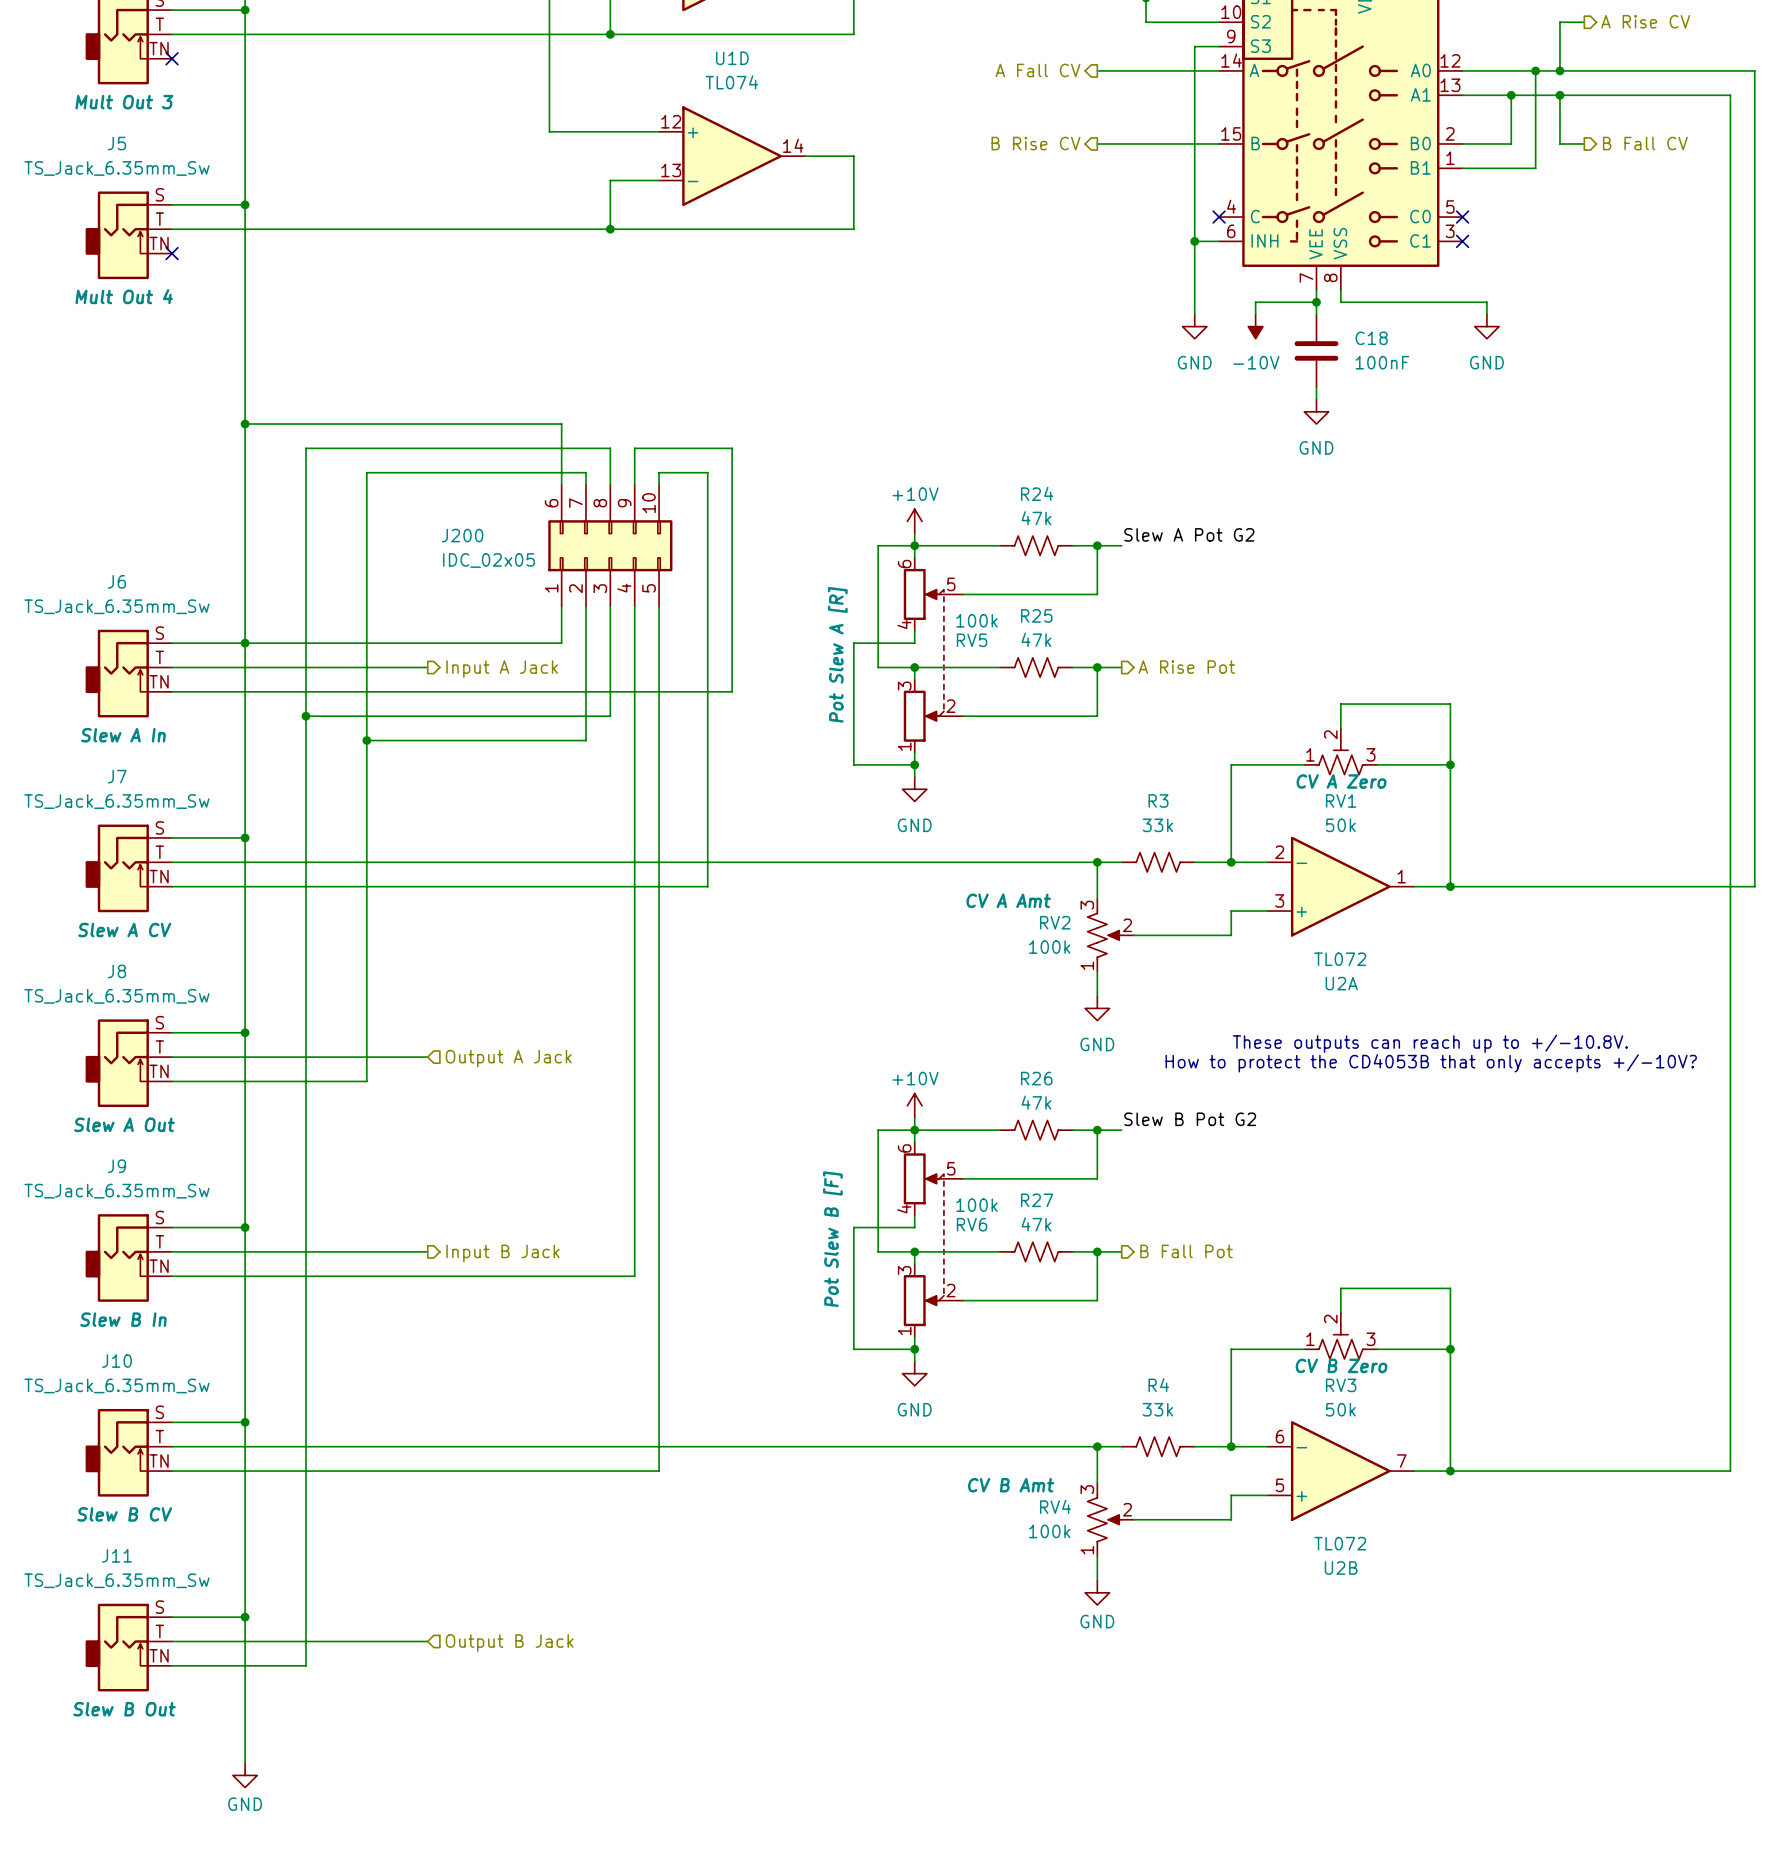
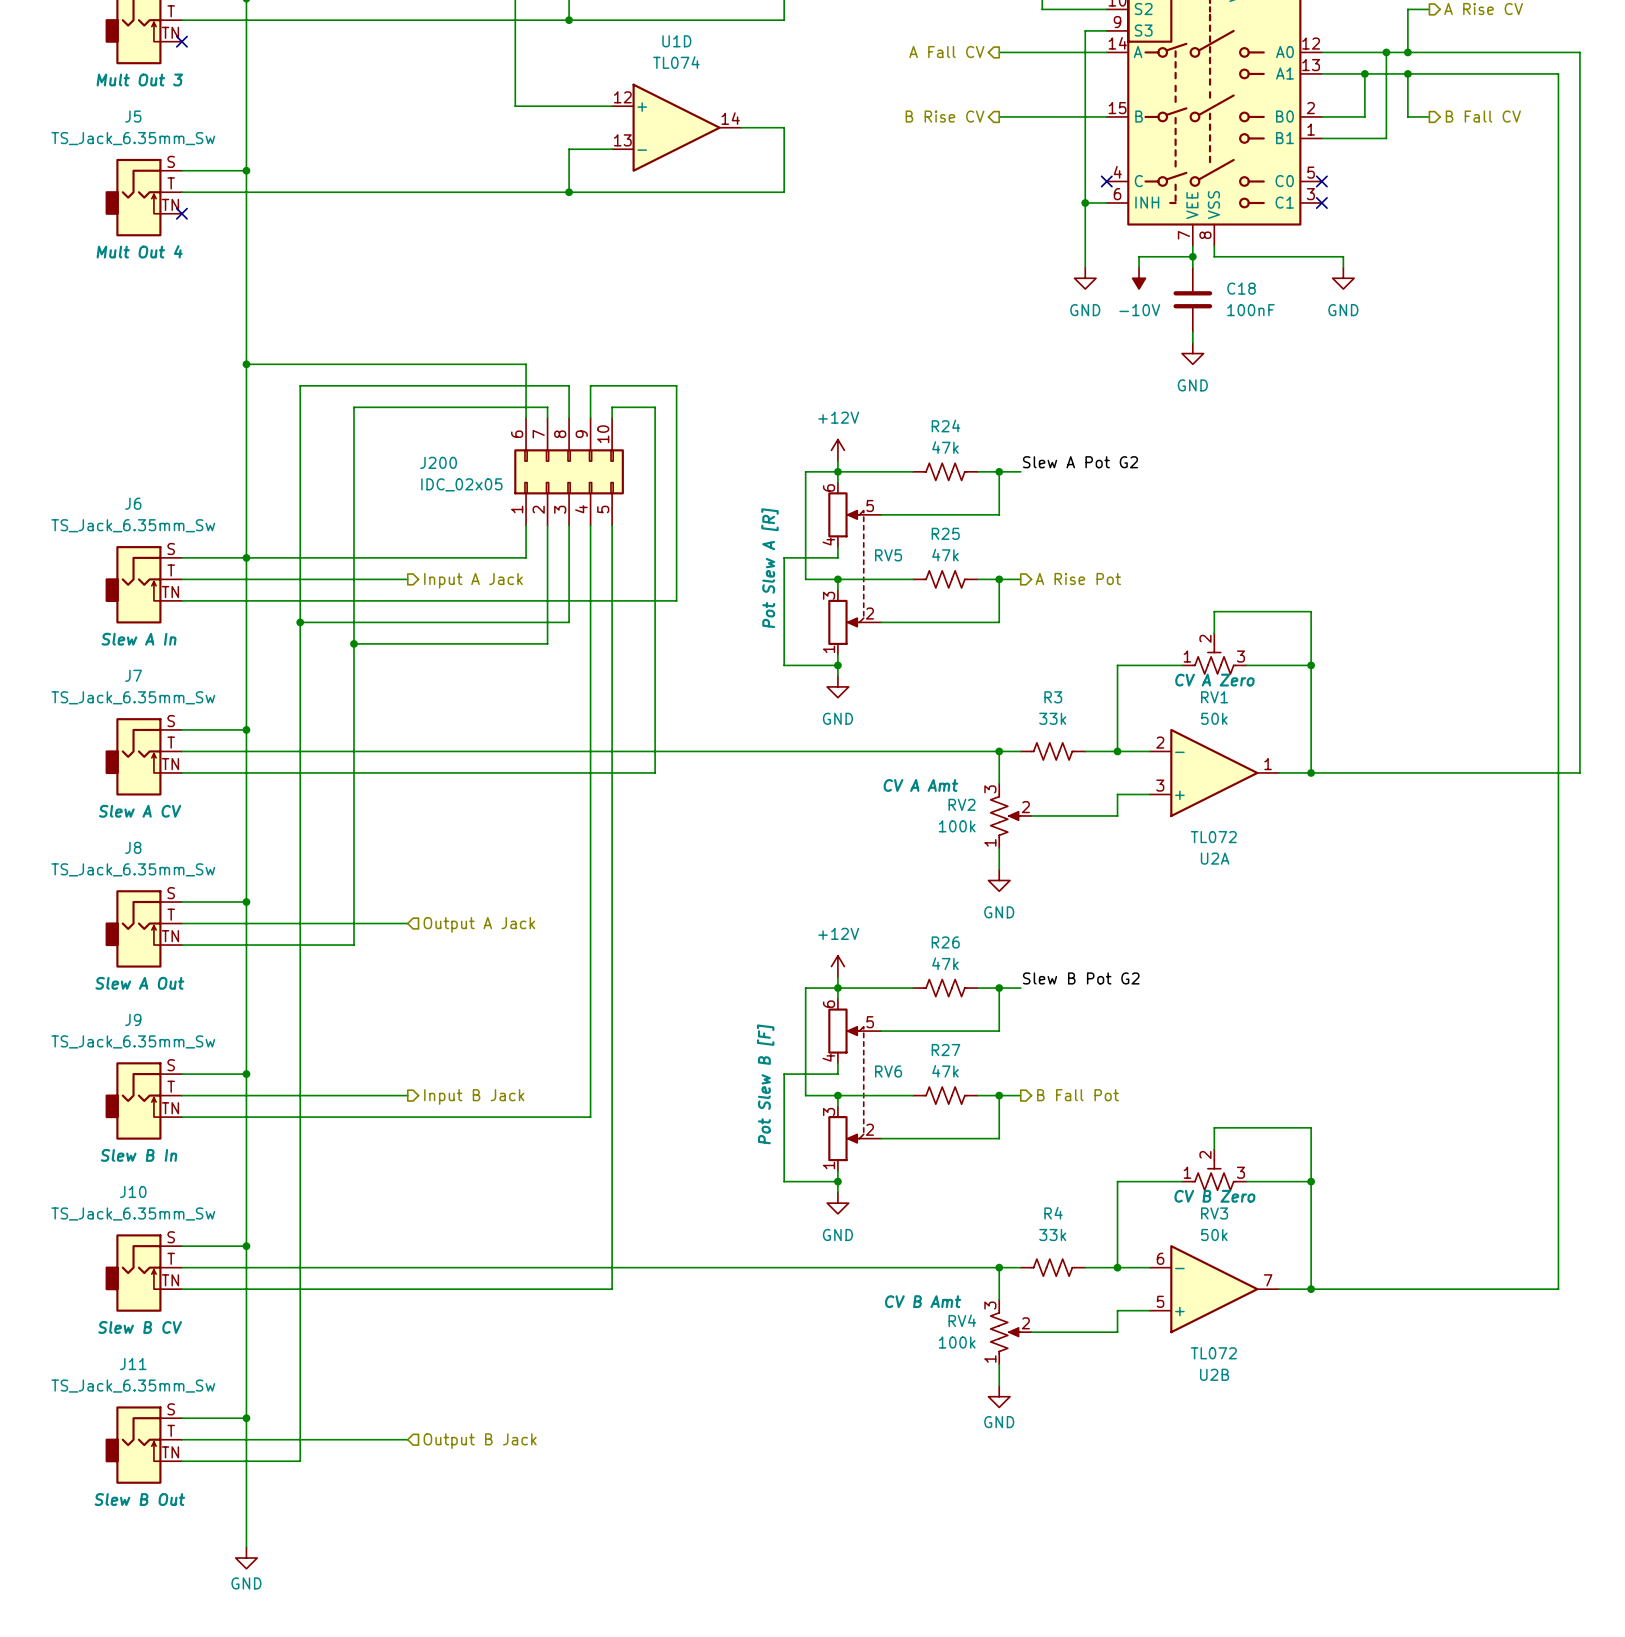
power symbol: +10V (914, 521) -> +12V (837, 450)
RV5 value: 100k (976, 620) -> none
text: These outputs can reach up to +/-10.8V. (1430, 1043) -> none
text: How to protect the CD4053B that only accepts +/-10V? (1431, 1063) -> none
power symbol: +10V (914, 1105) -> +12V (837, 966)
RV6 value: 100k (976, 1205) -> none

